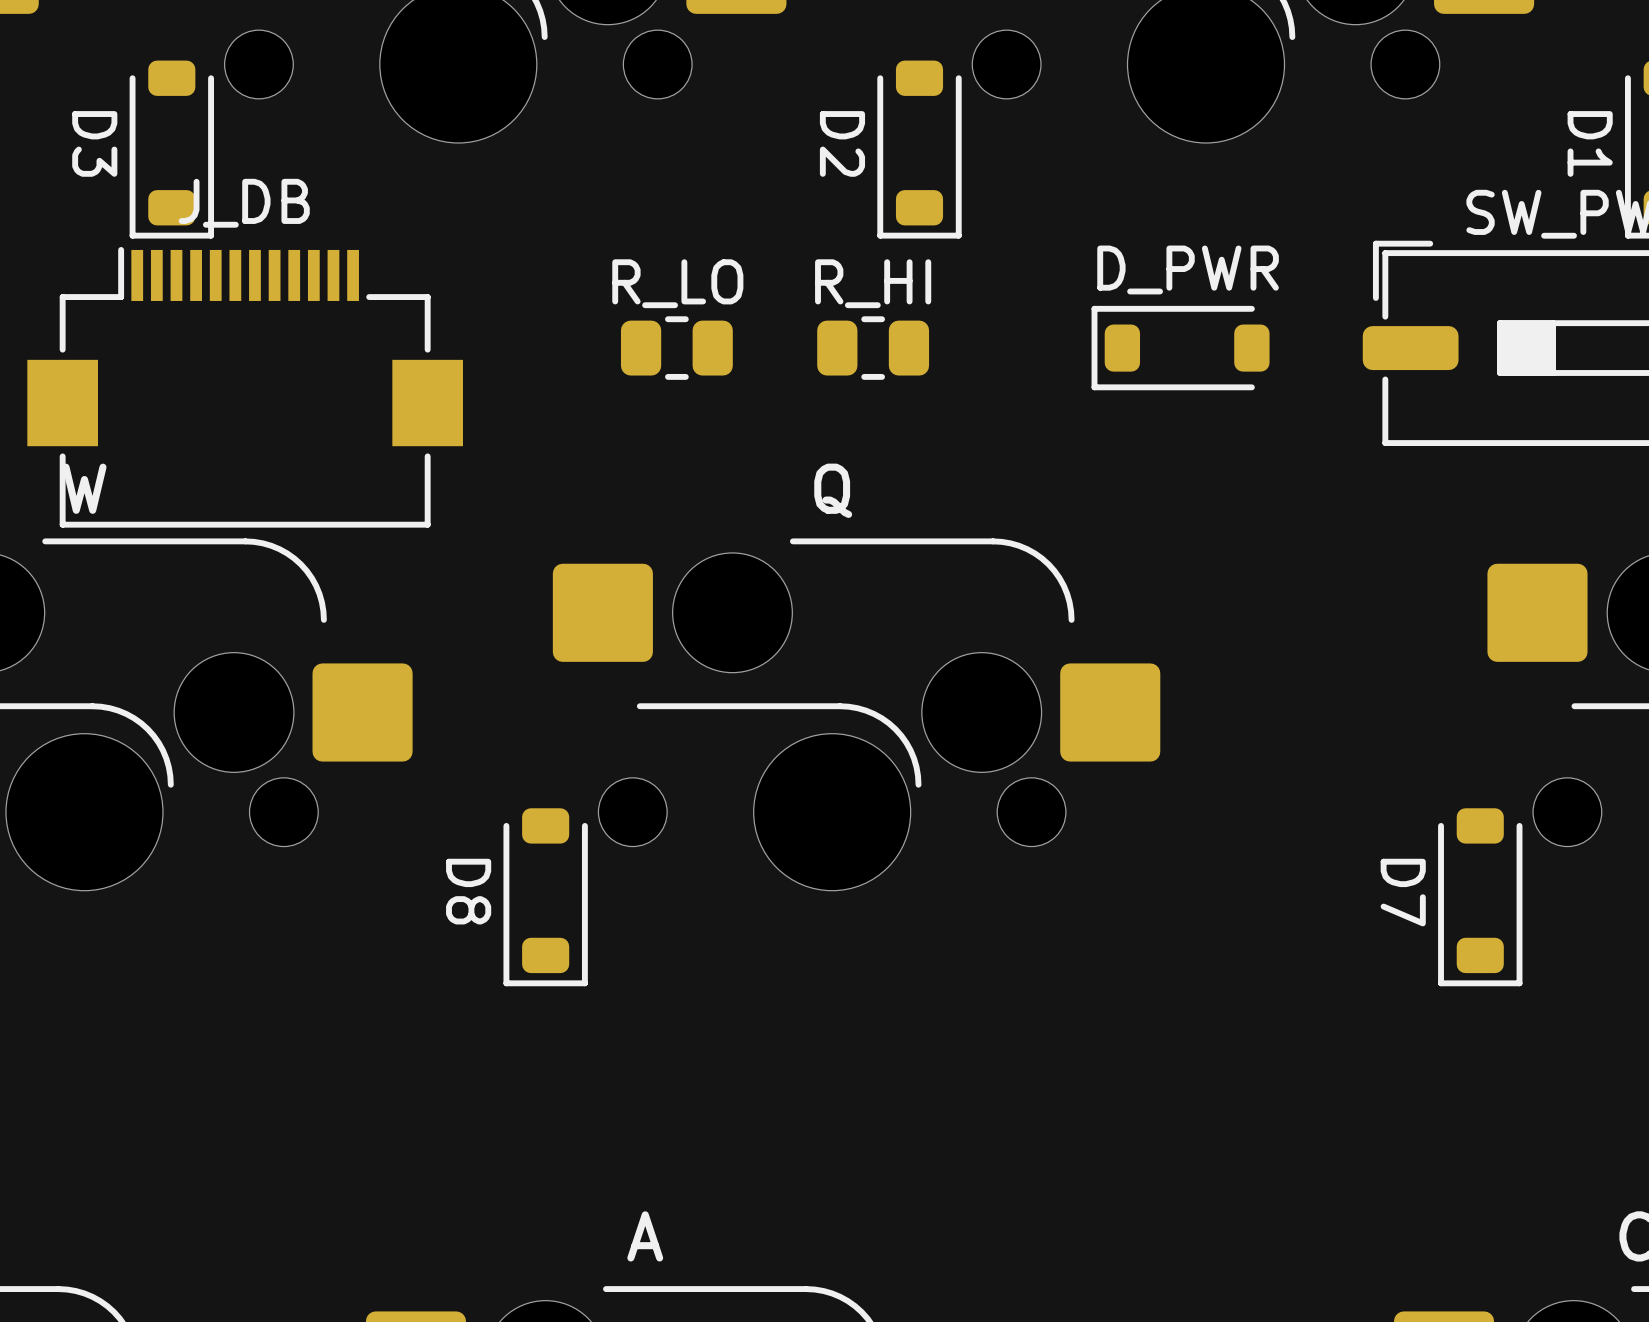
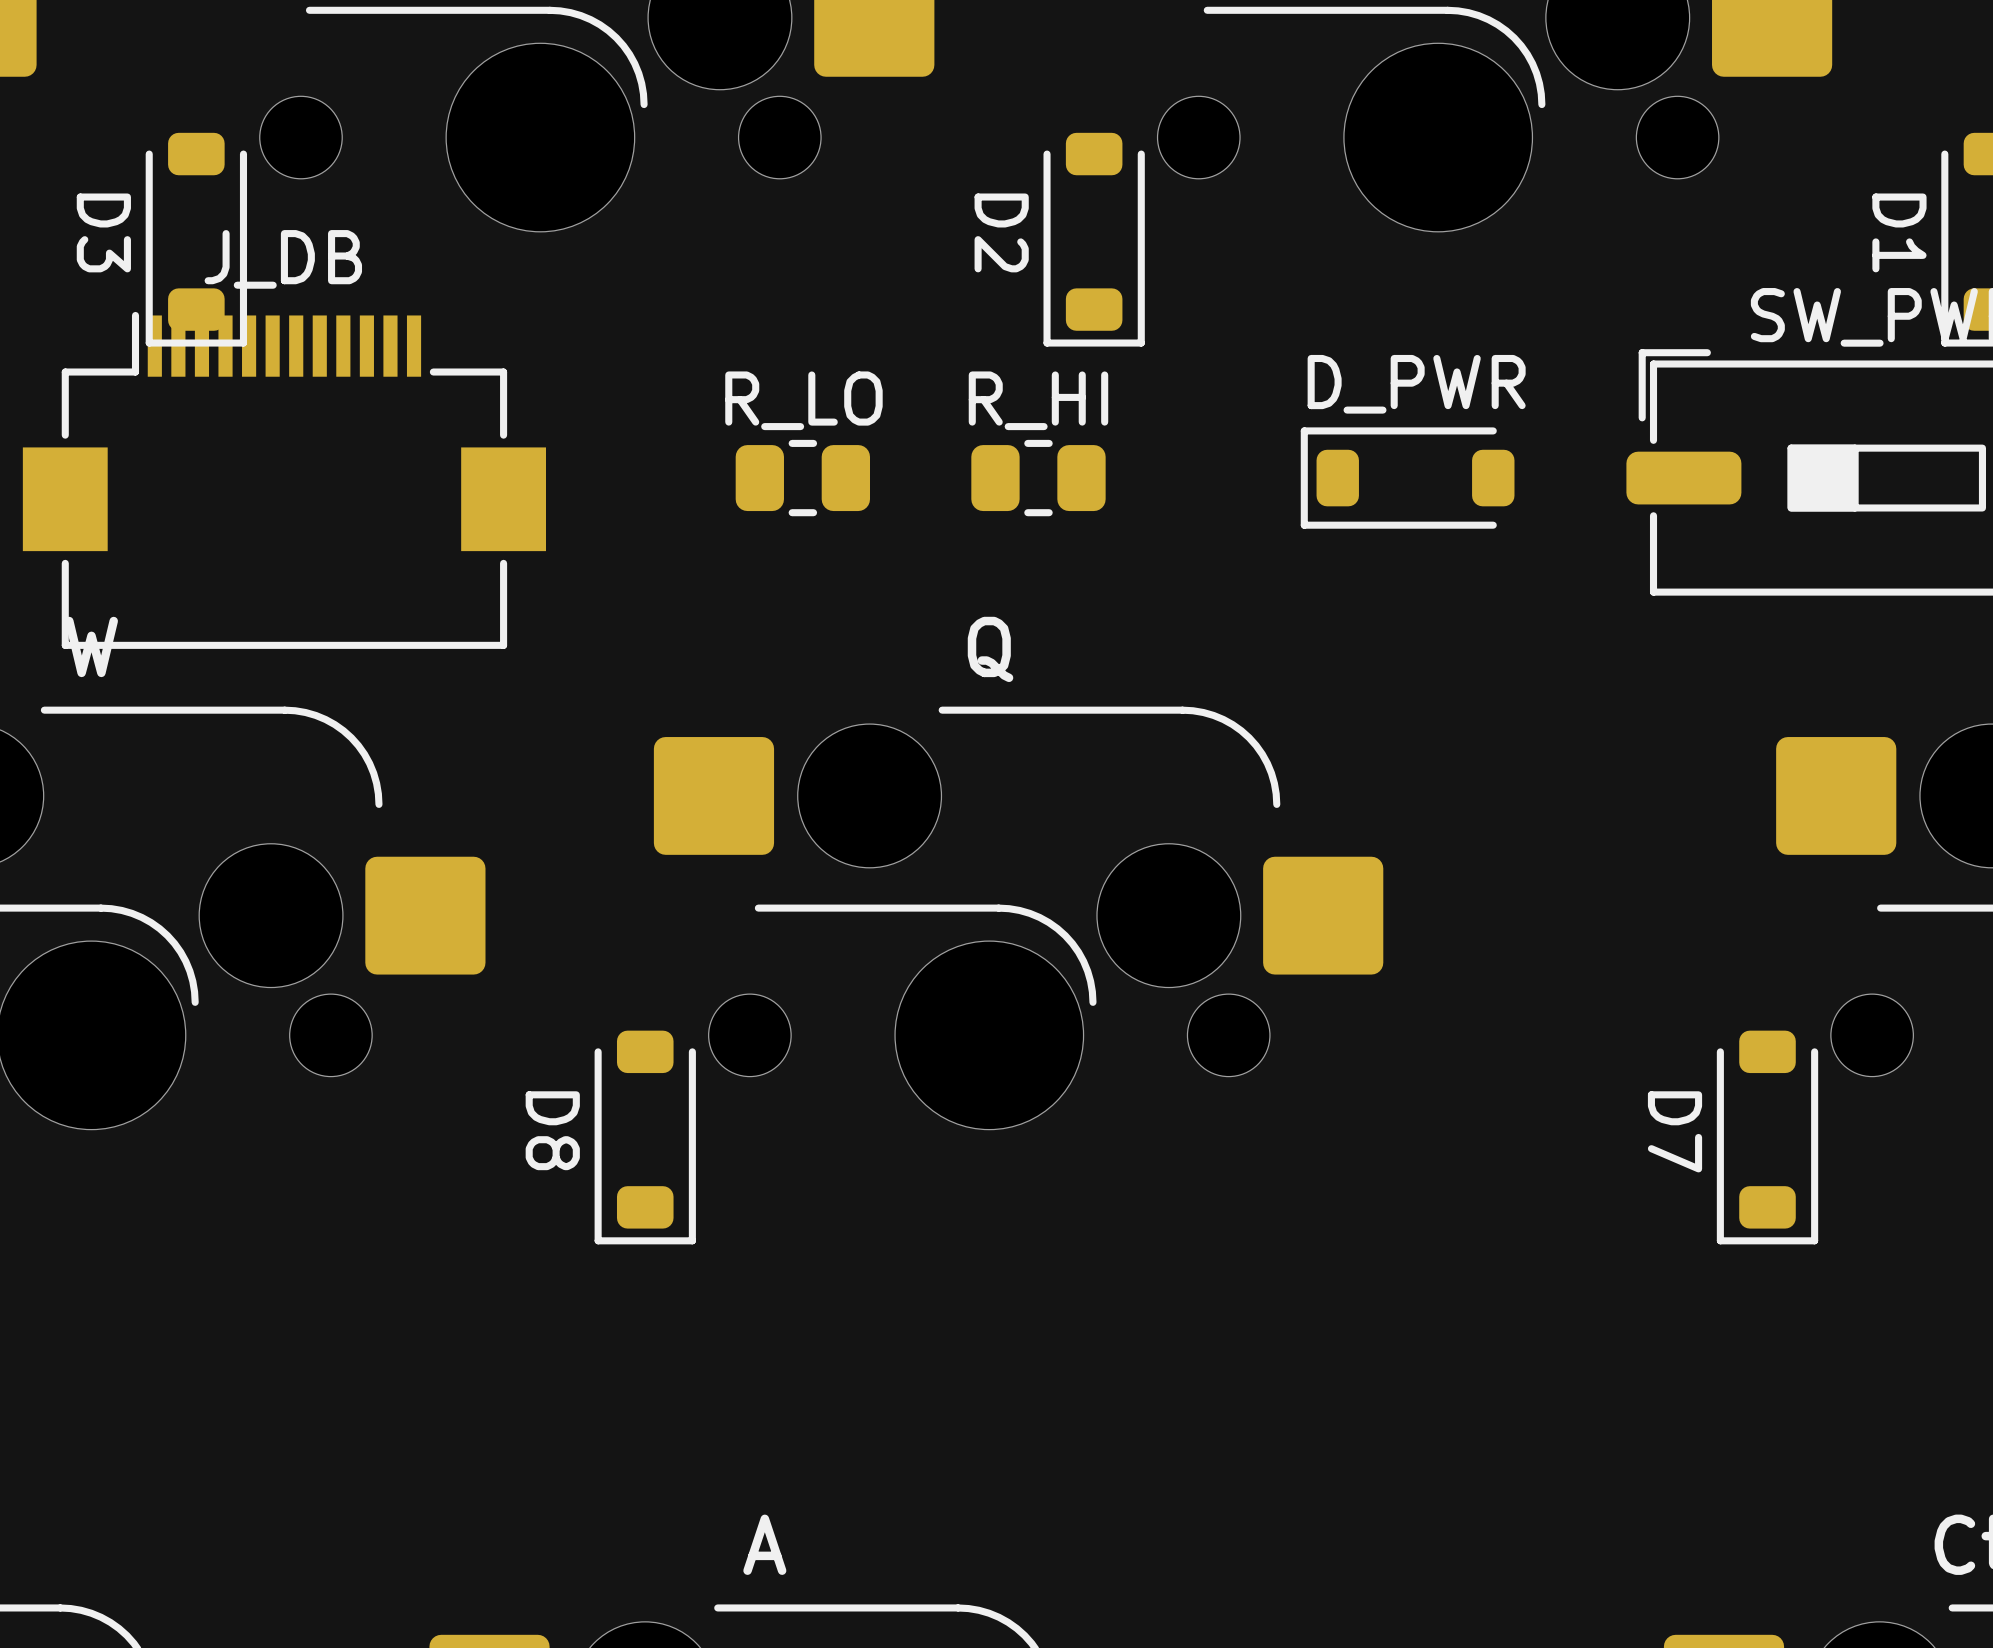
J_DB position: (245, 387) -> (284, 480)

